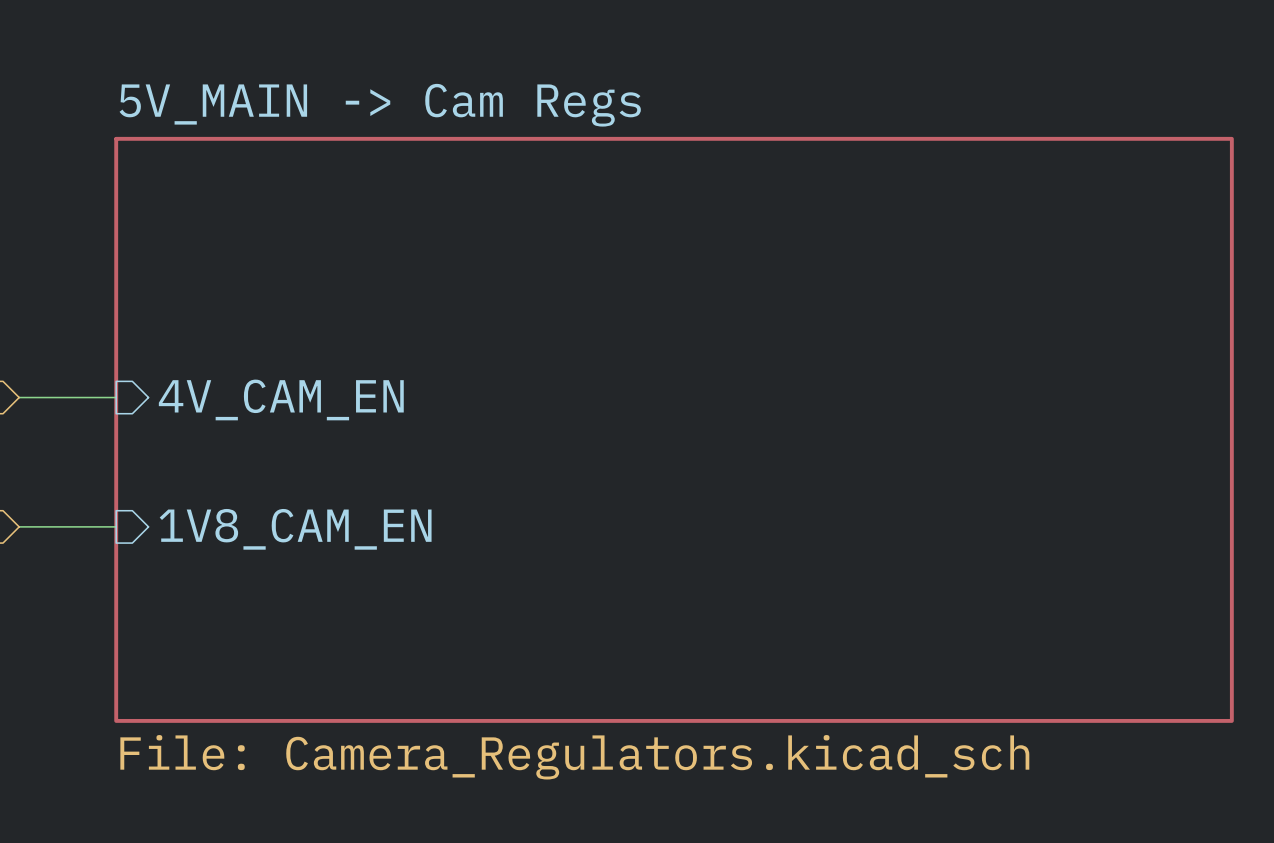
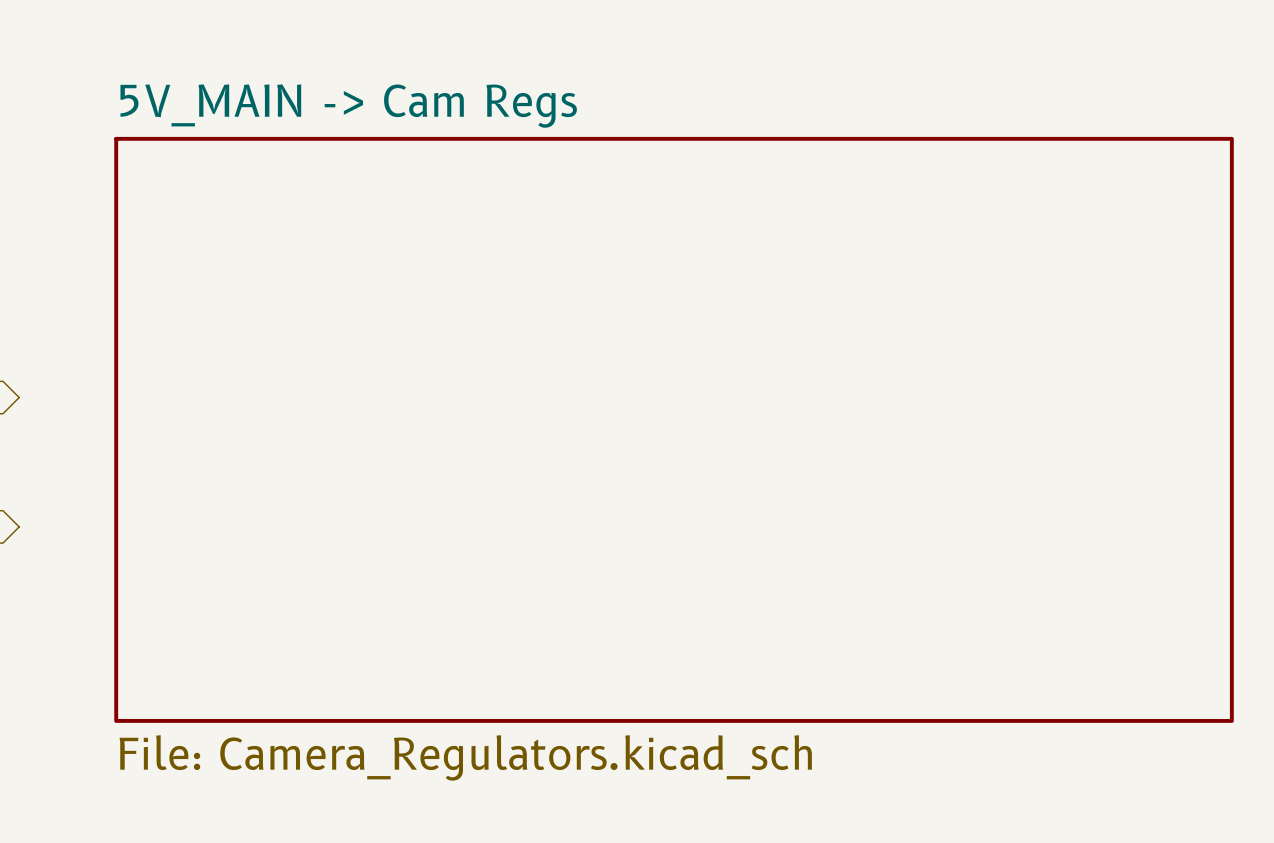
wire: (19, 397) (116, 397) -> none
sheet pin: 4V_CAM_EN (281, 399) -> none
wire: (19, 526) (116, 526) -> none
sheet pin: 1V8_CAM_EN (295, 529) -> none

